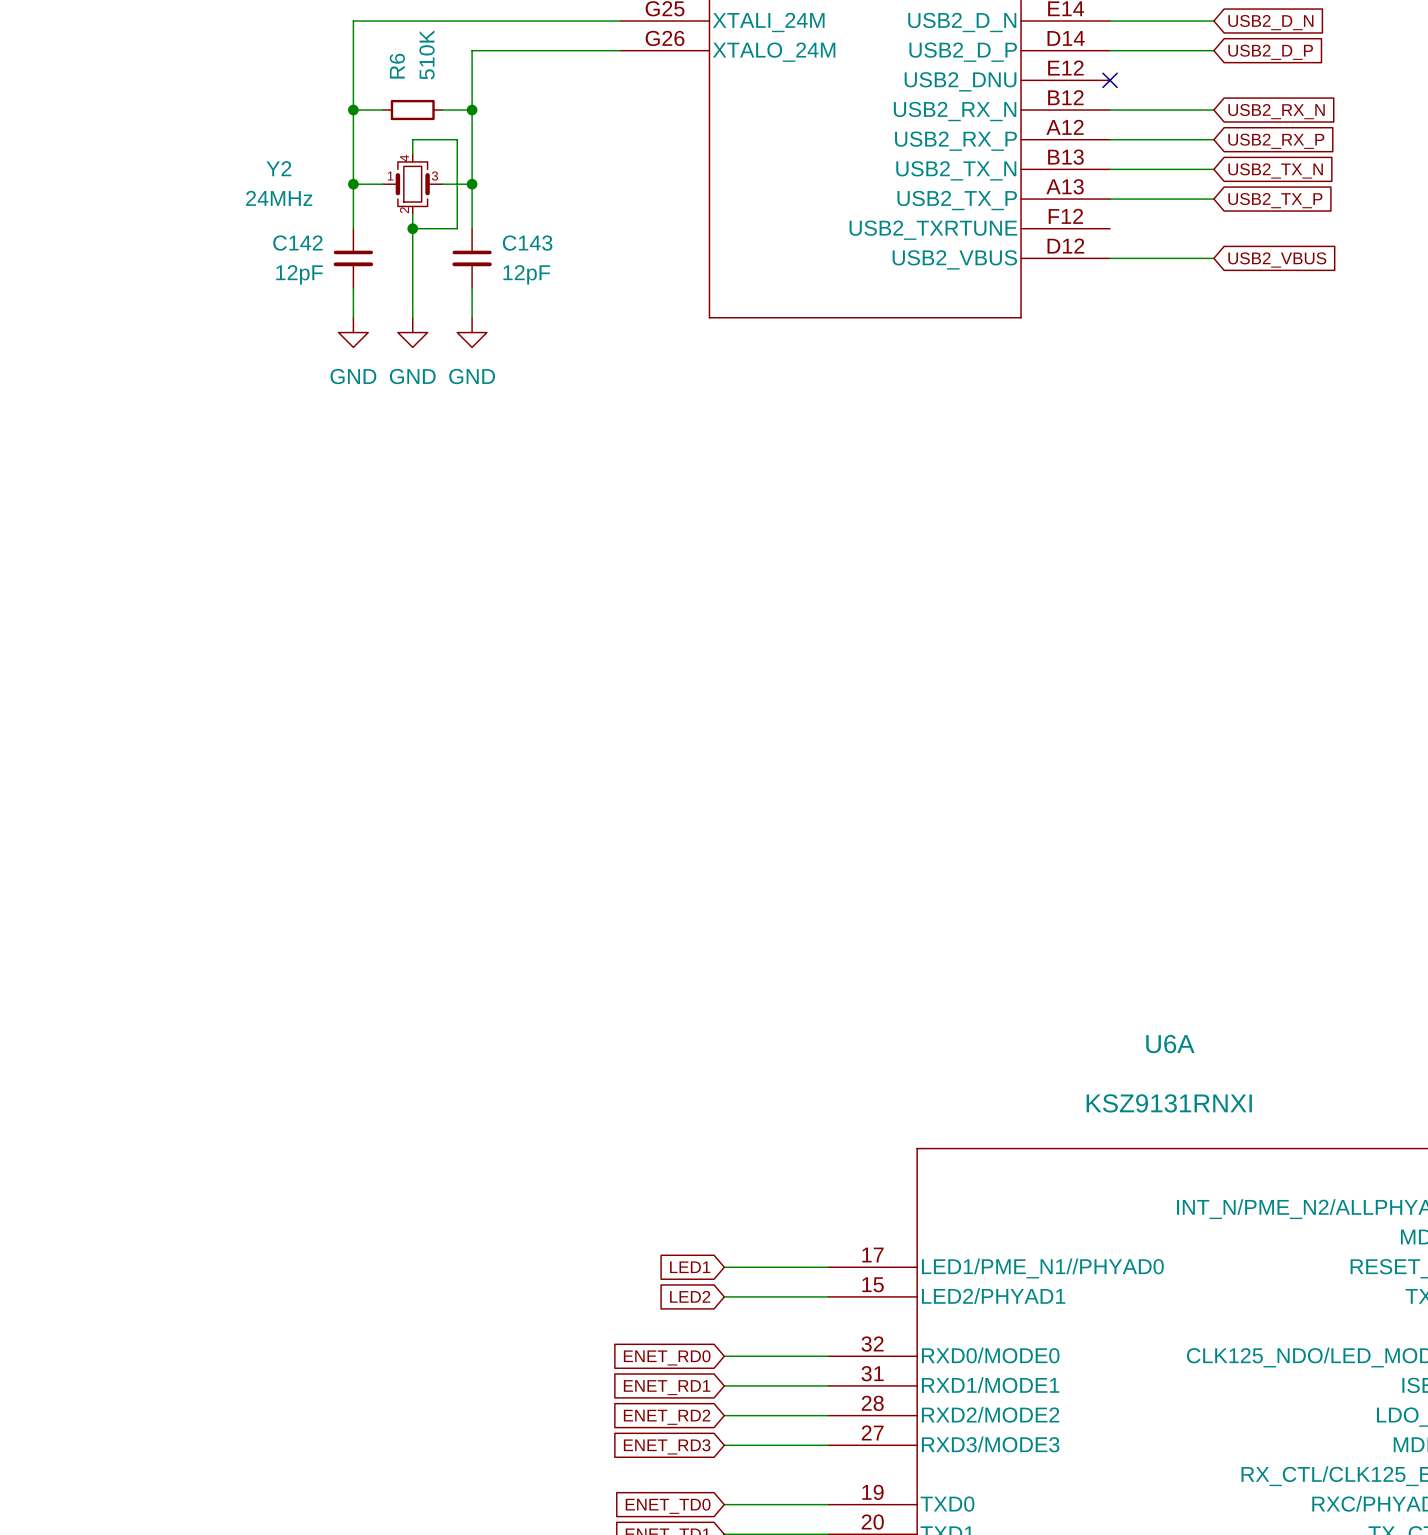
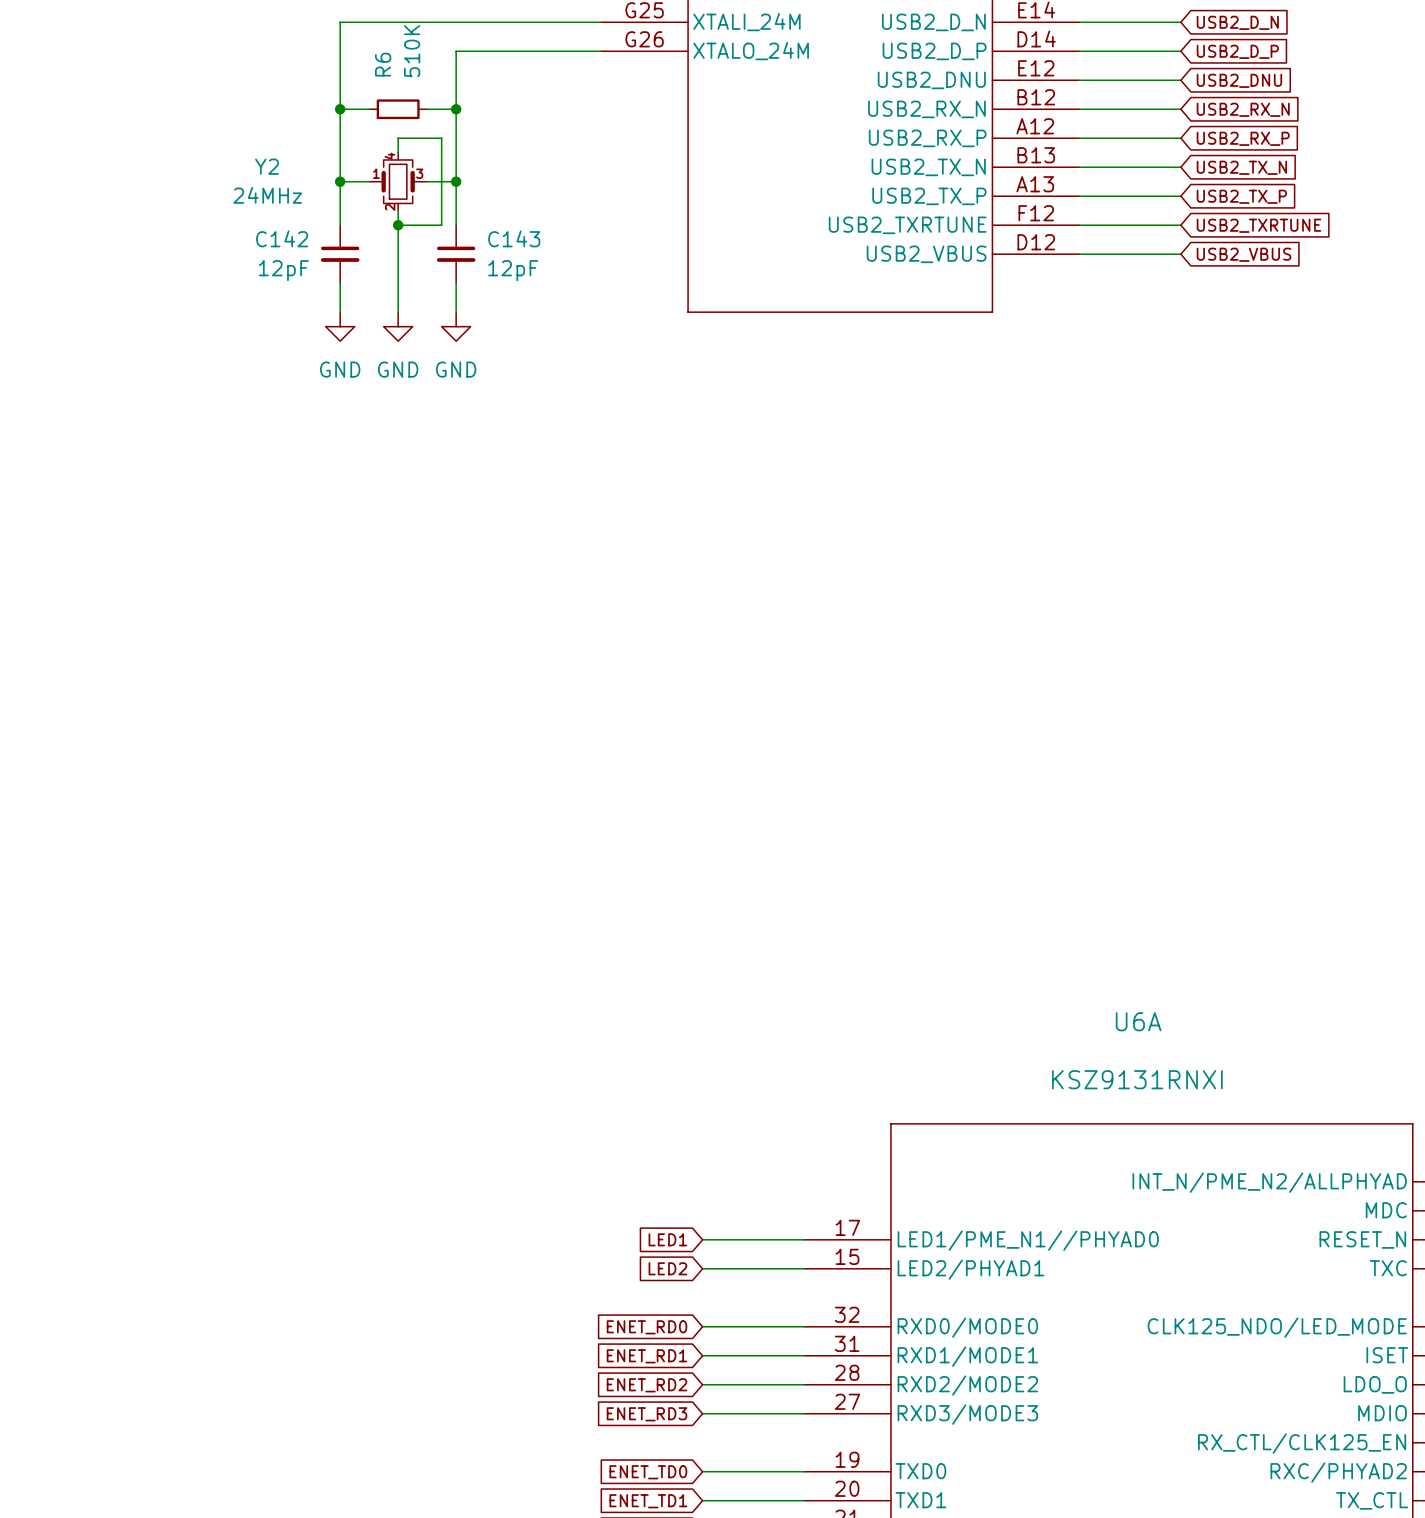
wire: none -> (1079, 80) (1180, 80)
no-connect mark: (1110, 80) -> none
global label: none -> USB2_DNU (1239, 80)
wire: none -> (1079, 225) (1180, 225)
global label: none -> USB2_TXRTUNE (1258, 225)

